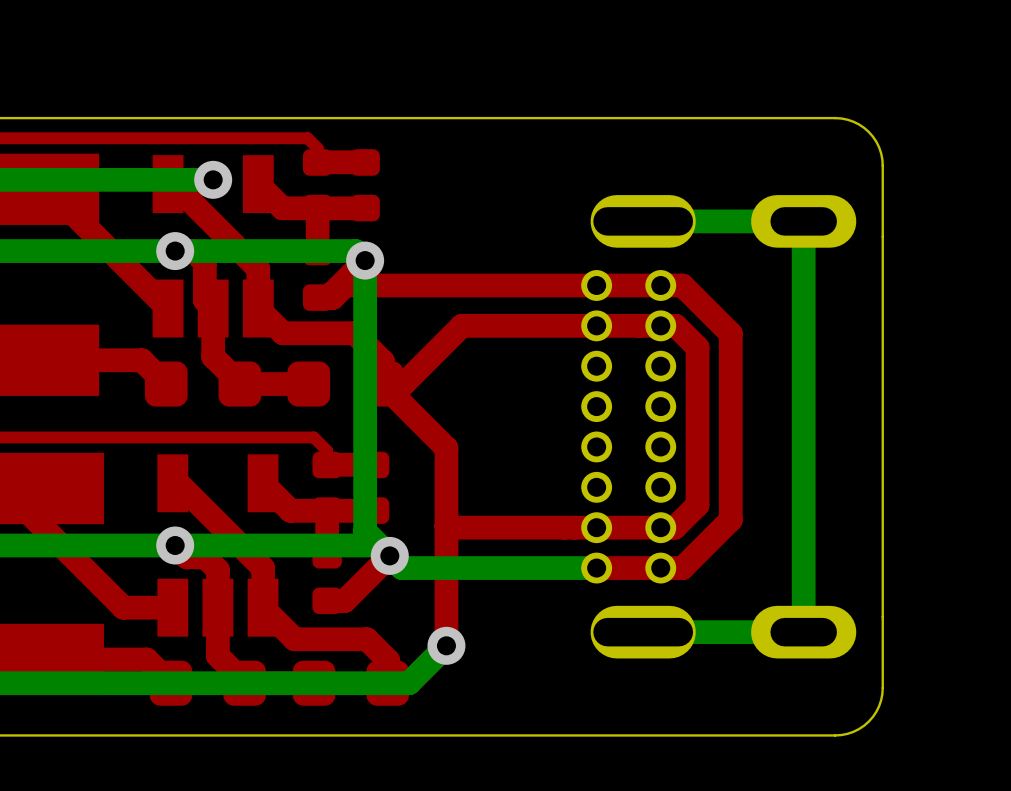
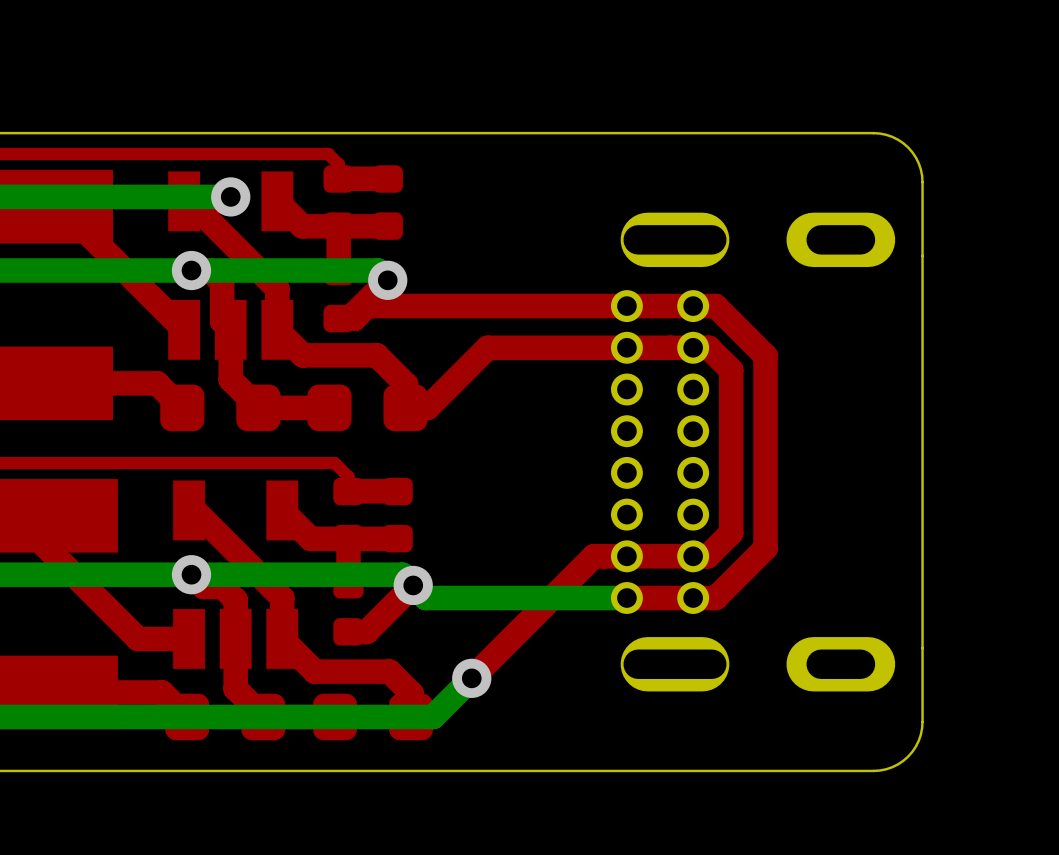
bottom track: (643, 221) (803, 221) (803, 632) (643, 632) -> none
bottom track: (365, 260) (365, 531) (379, 545) -> none
top track: (382, 384) (446, 448) (446, 645) -> none
top track: (446, 525) (448, 527) (564, 527) -> (471, 678) (593, 556)

